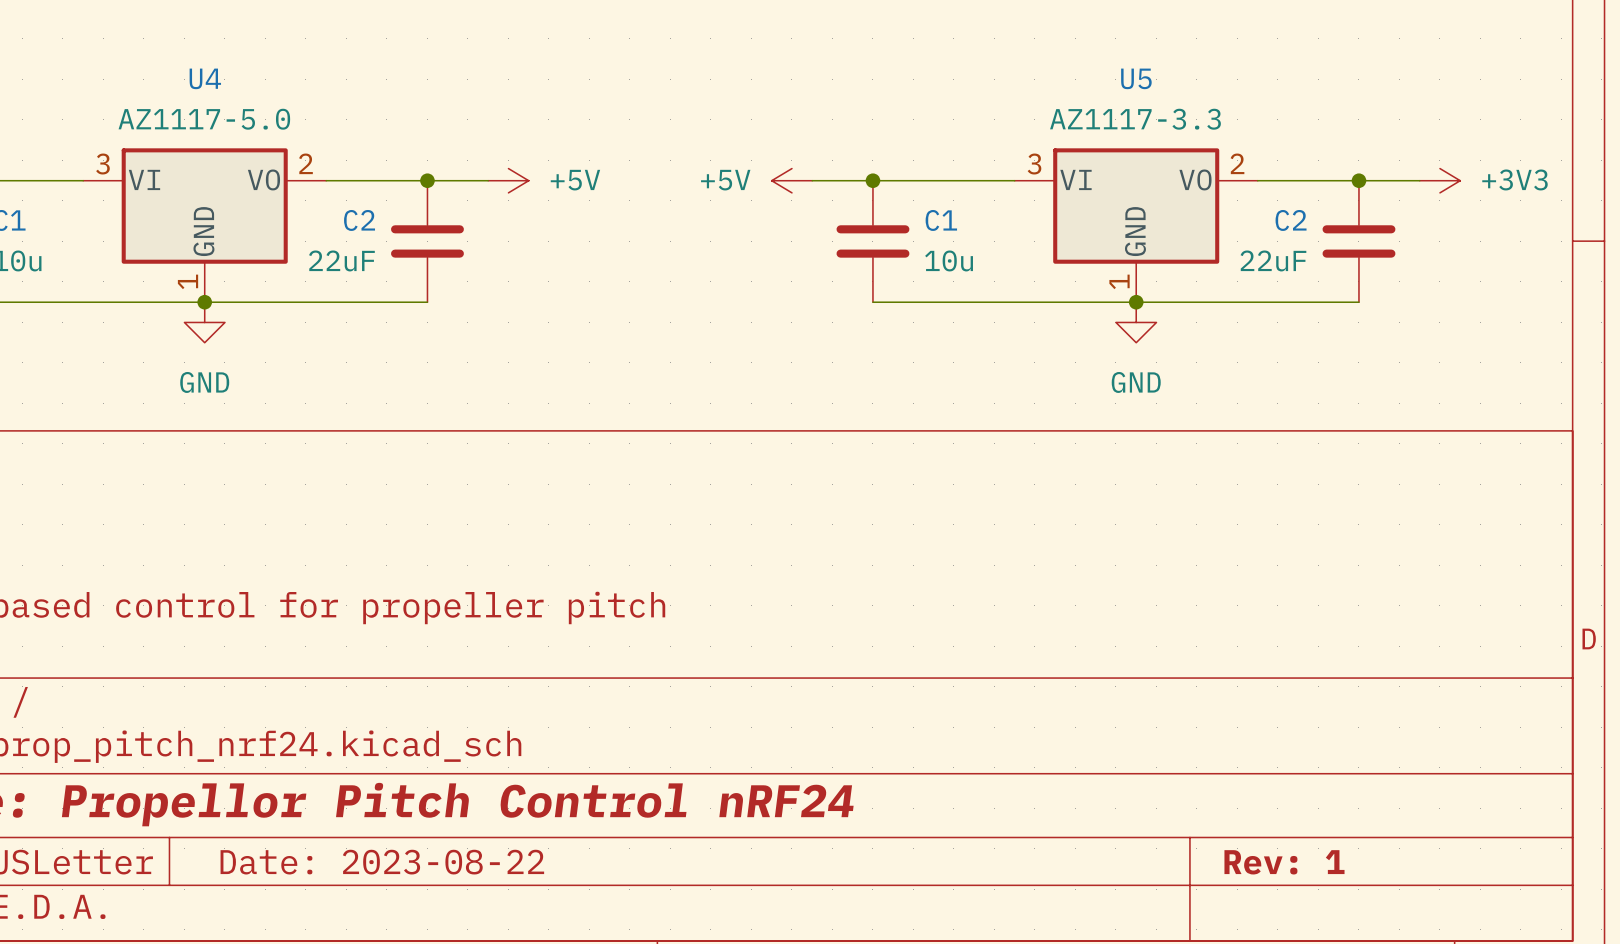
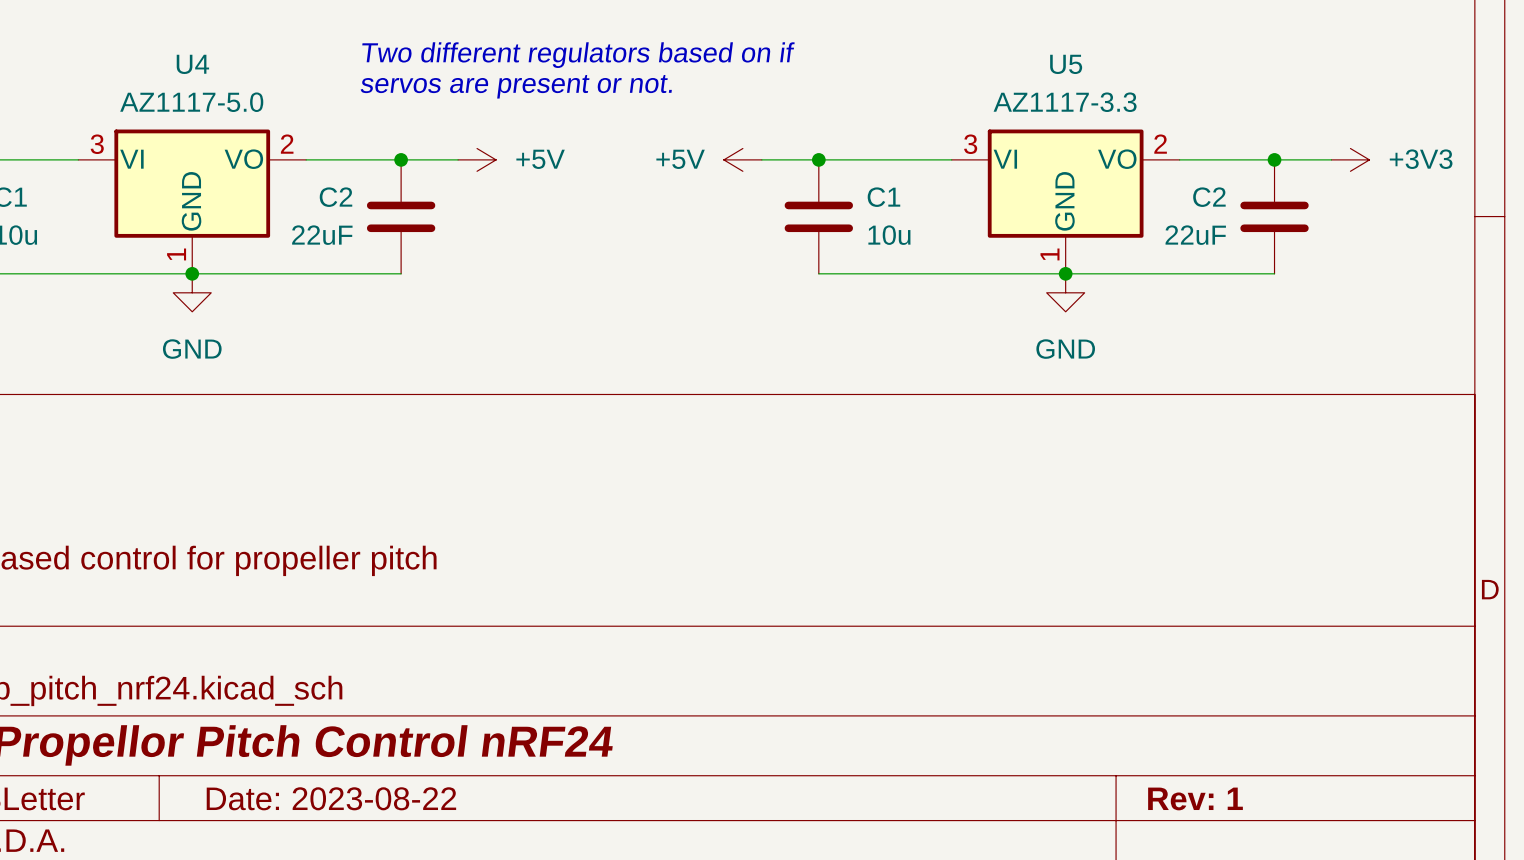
text: none -> Two different regulators based on if (578, 55)
text: none -> servos are present or not. (516, 86)

